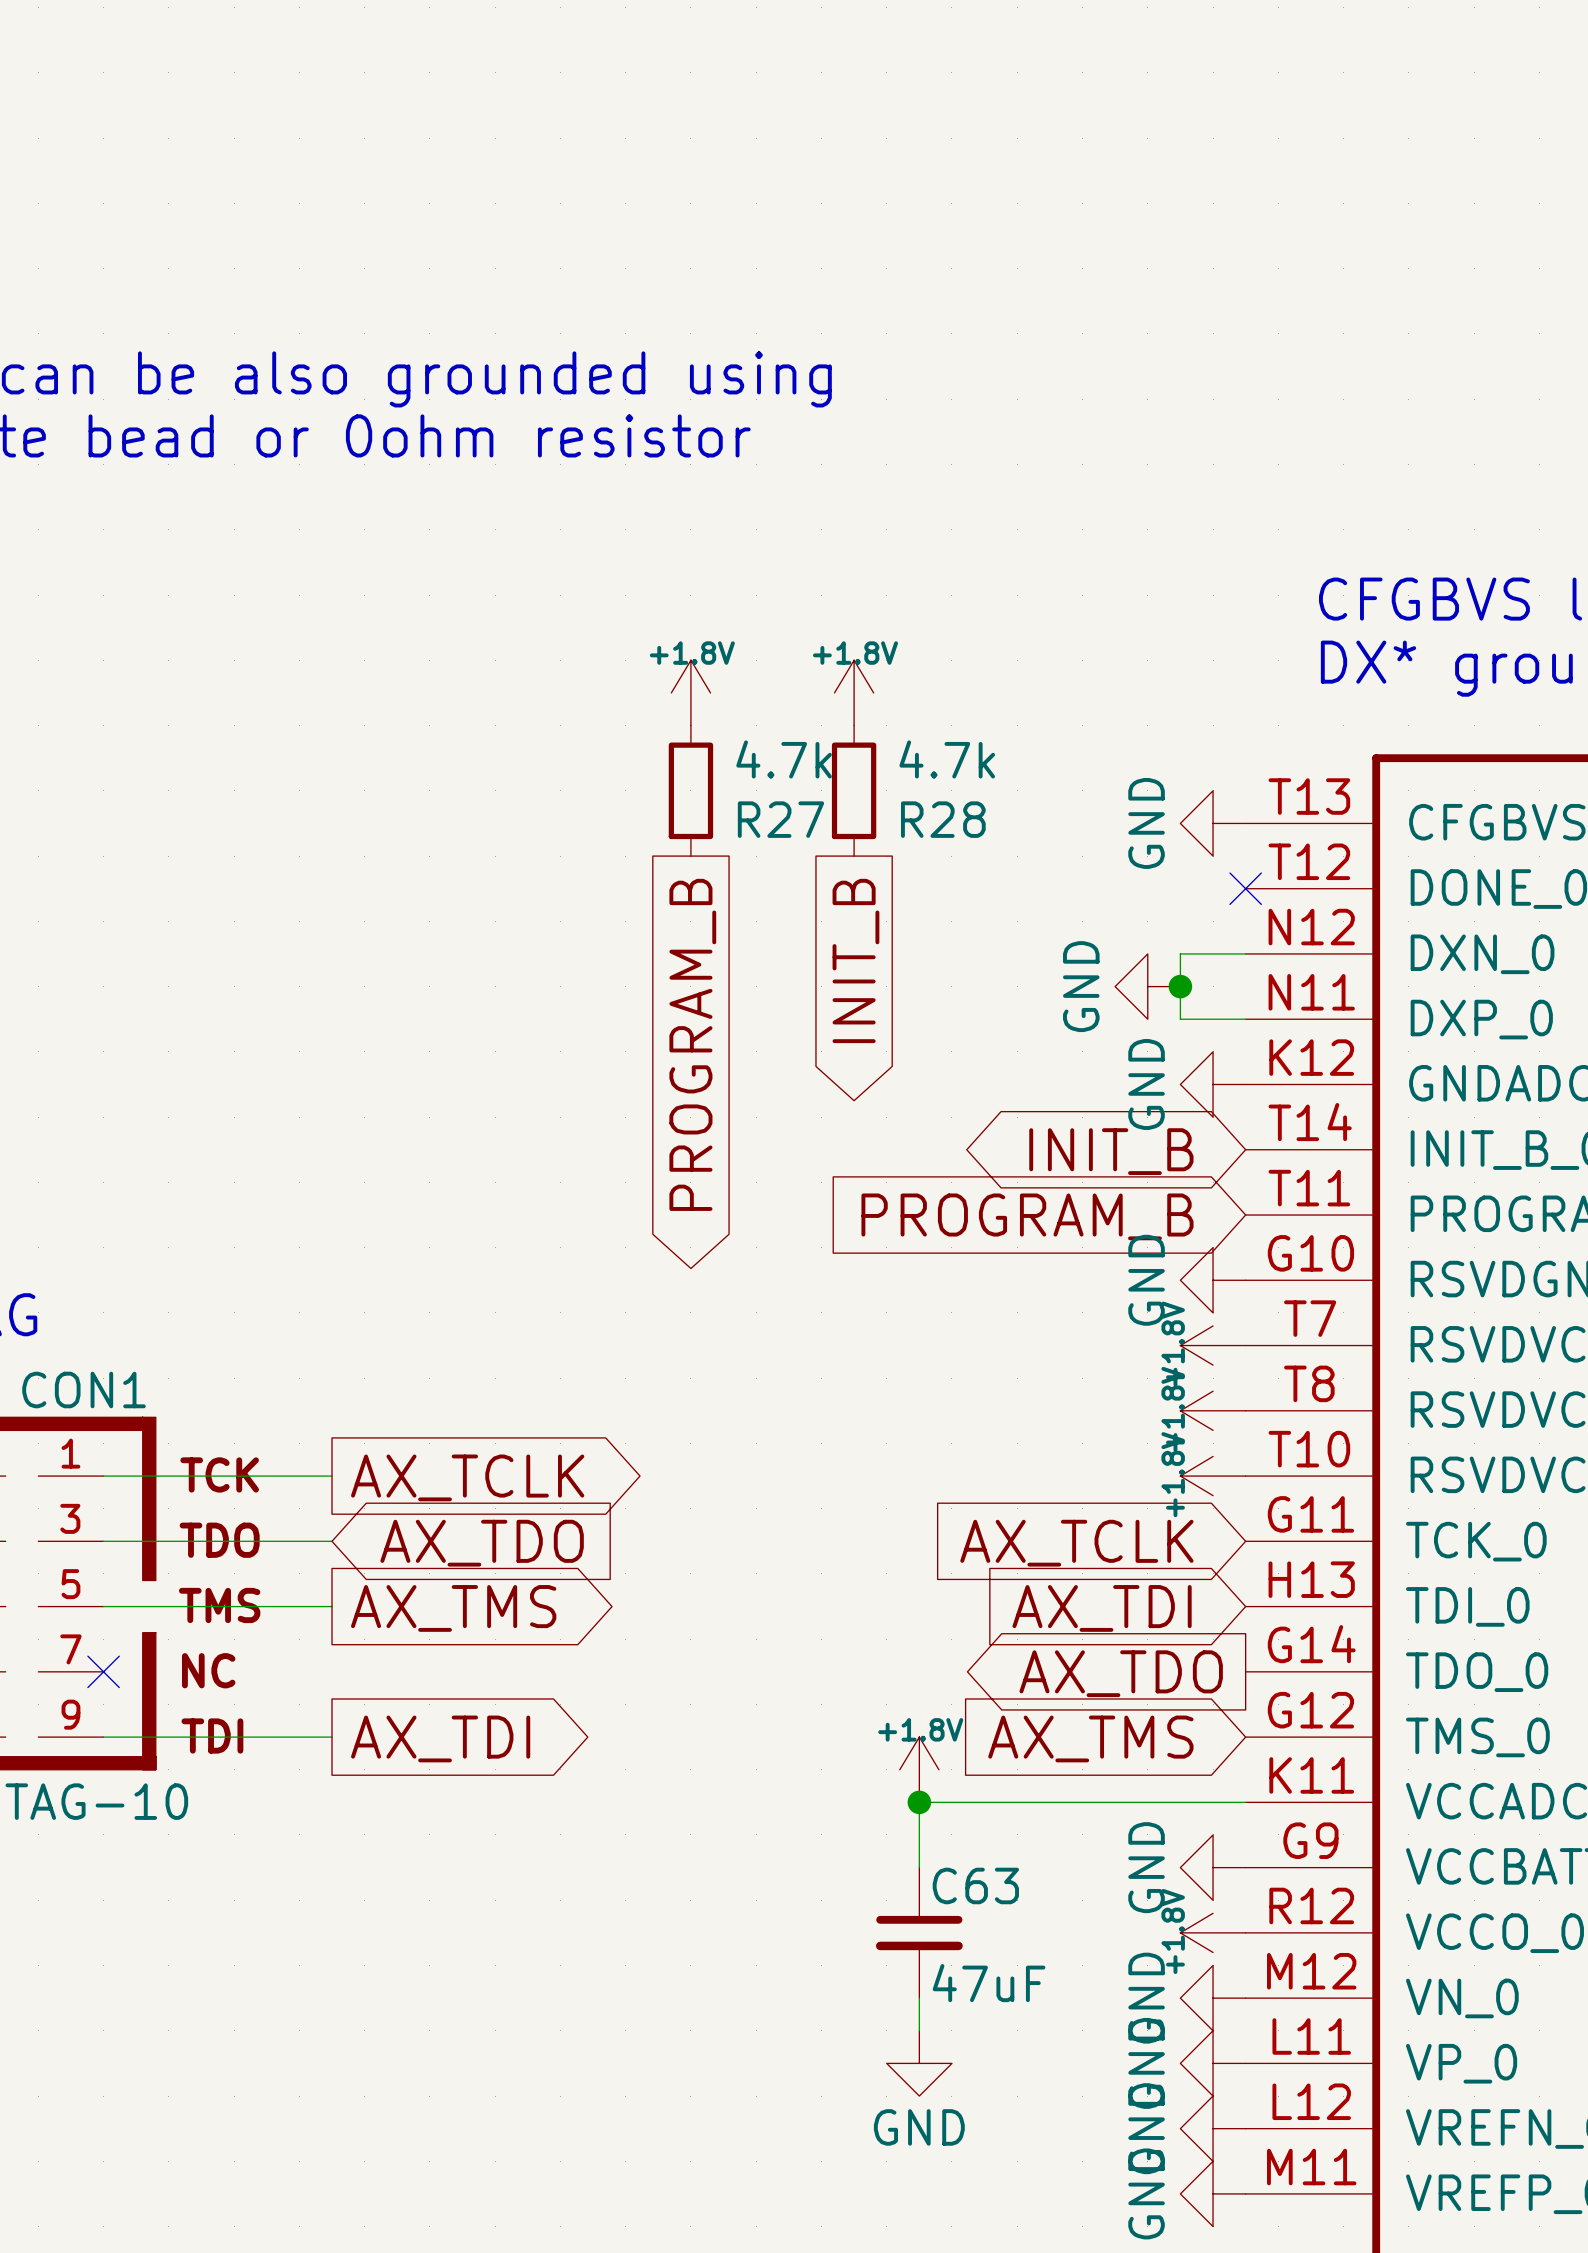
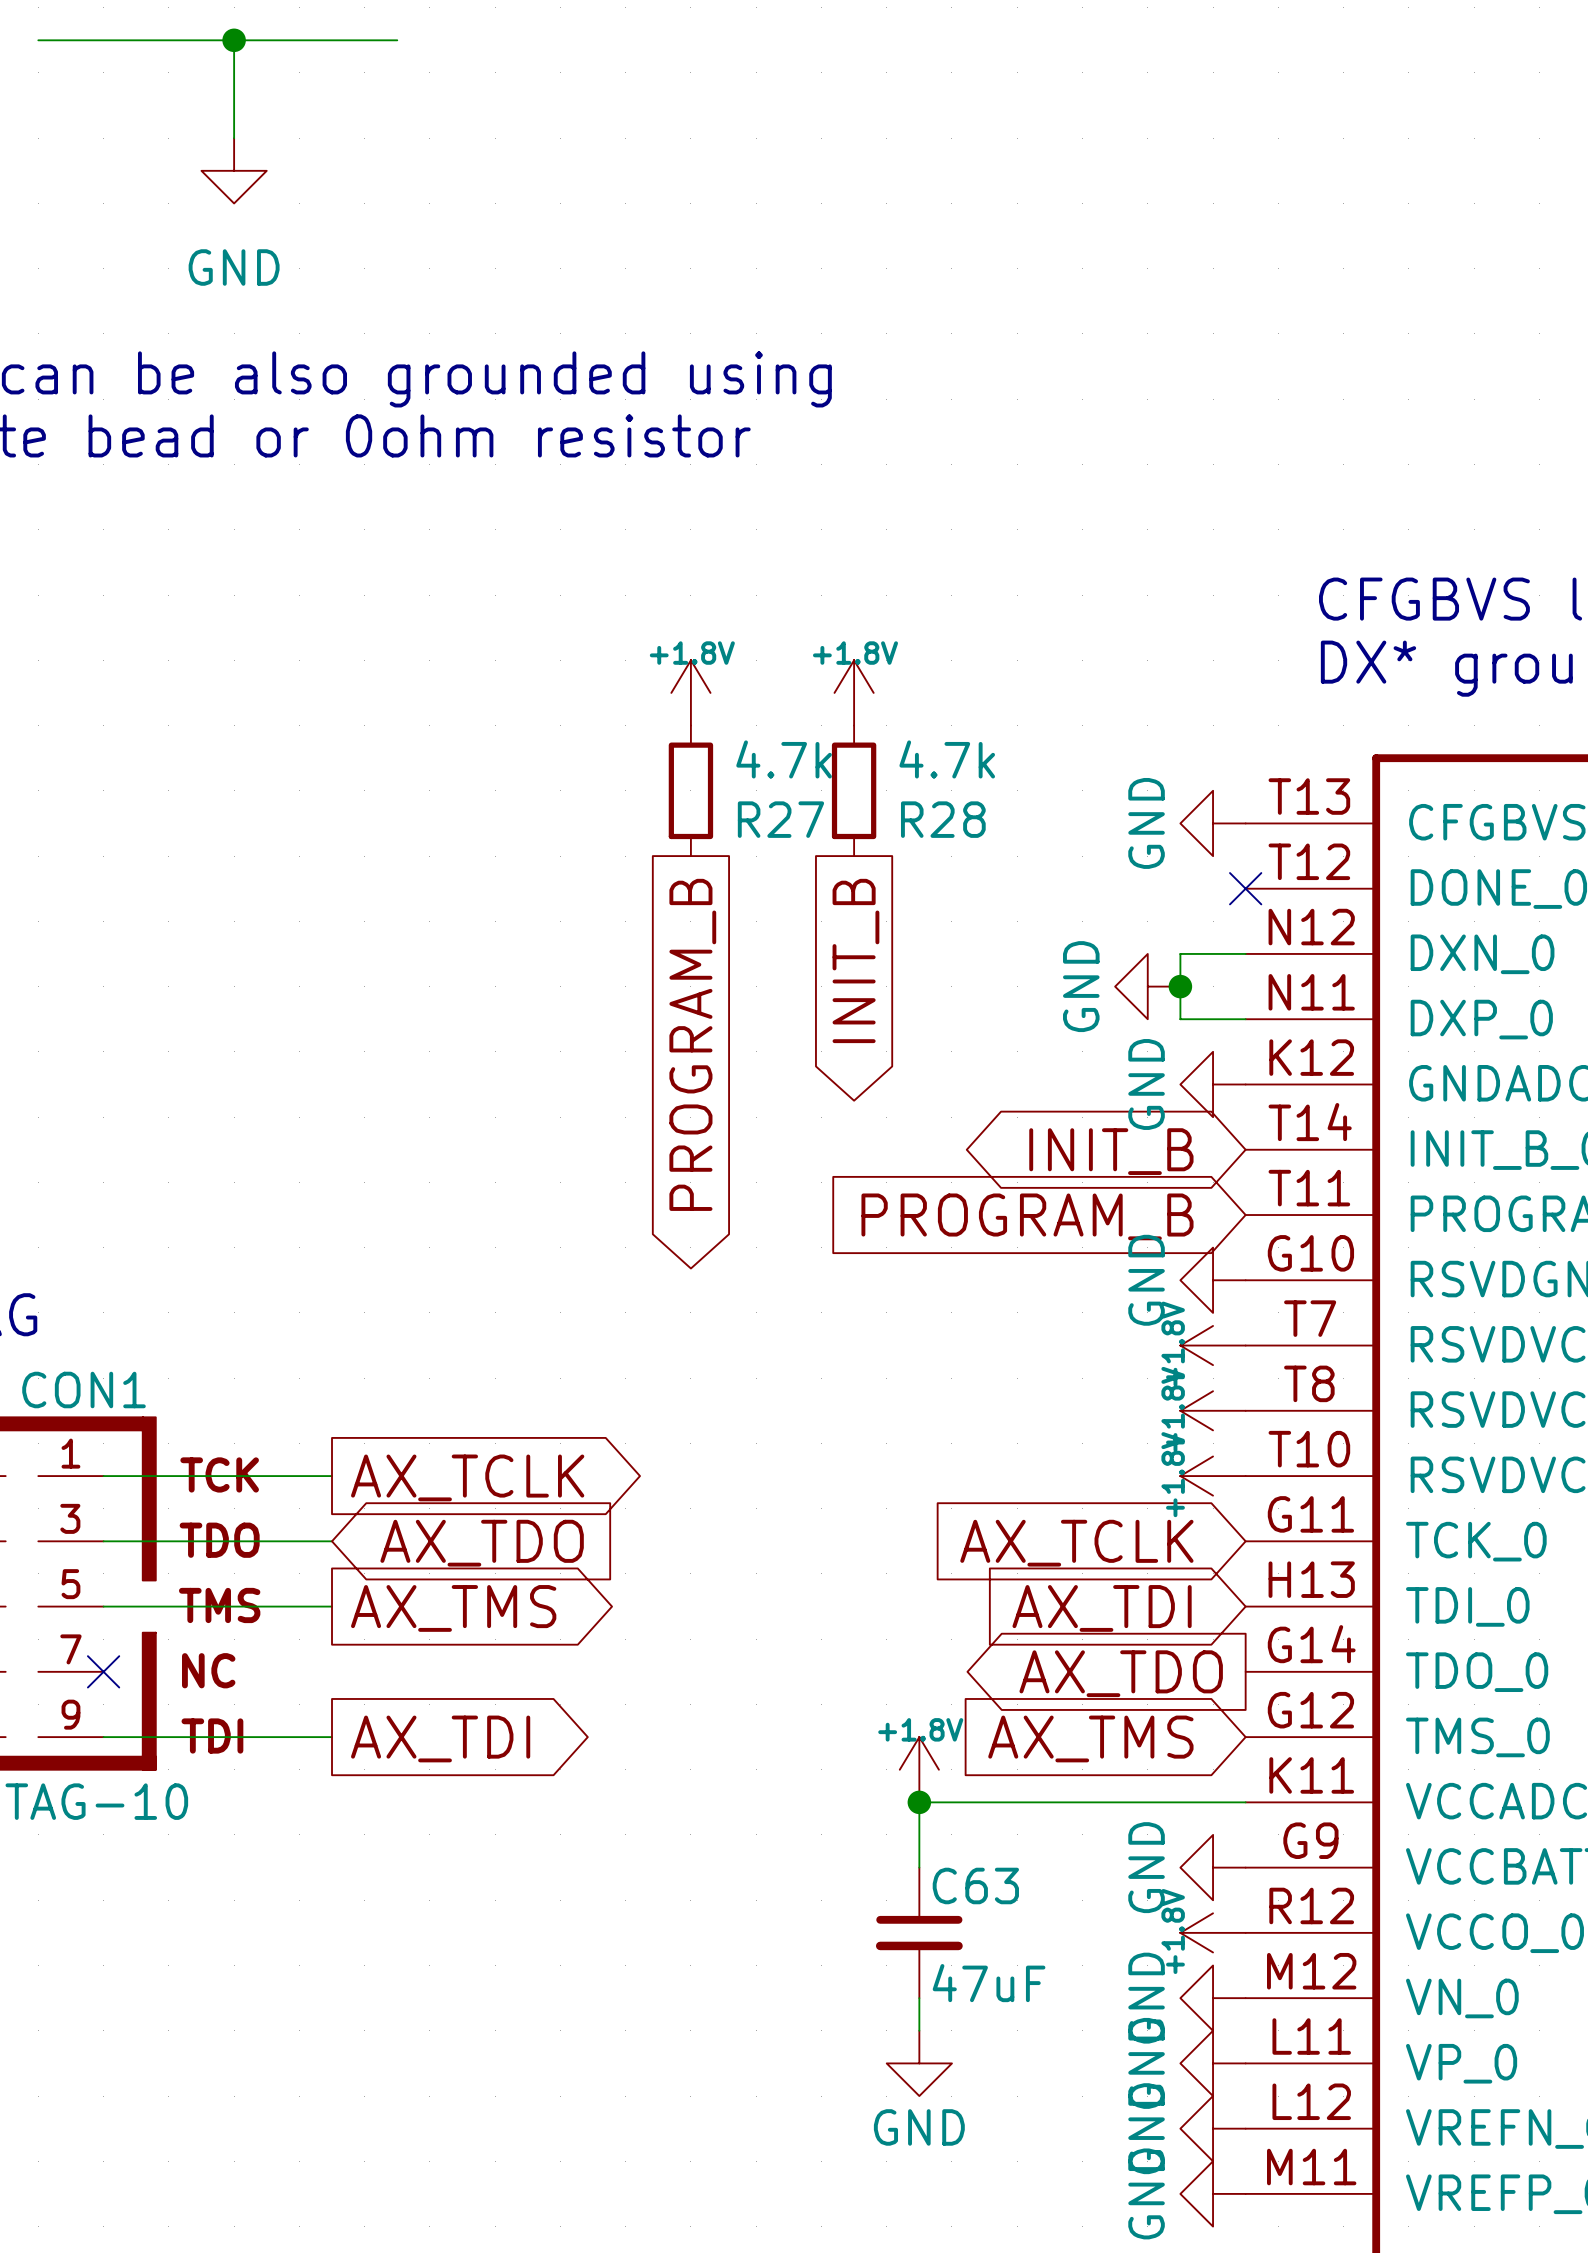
wire: none -> (38, 40) (397, 40)
wire: none -> (234, 40) (234, 138)
junction: none -> (234, 40)
power symbol: none -> GND (234, 170)

